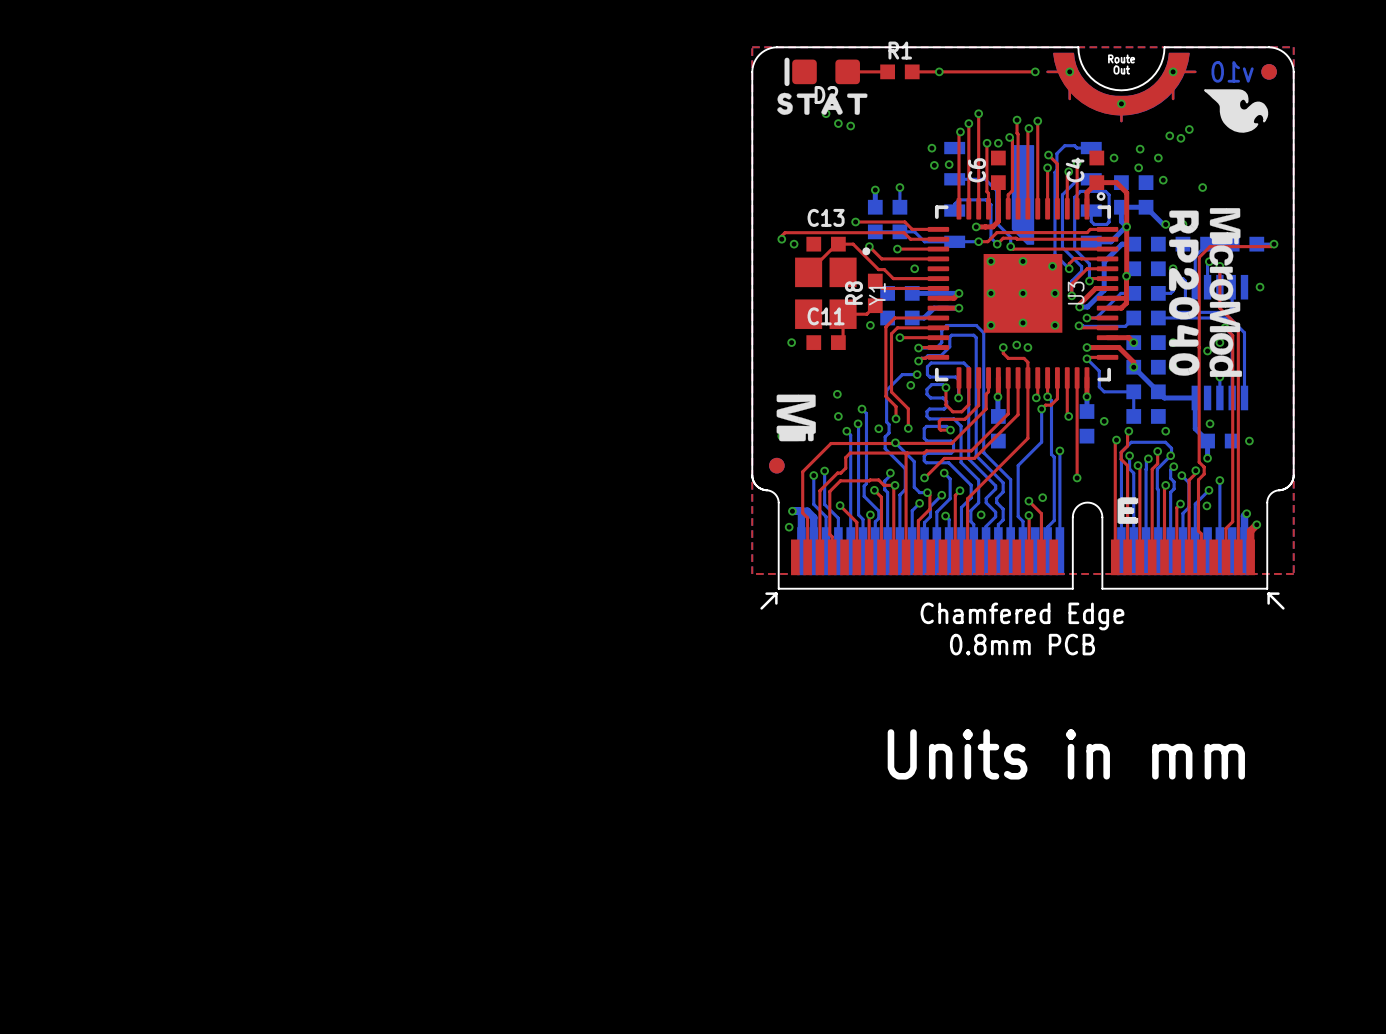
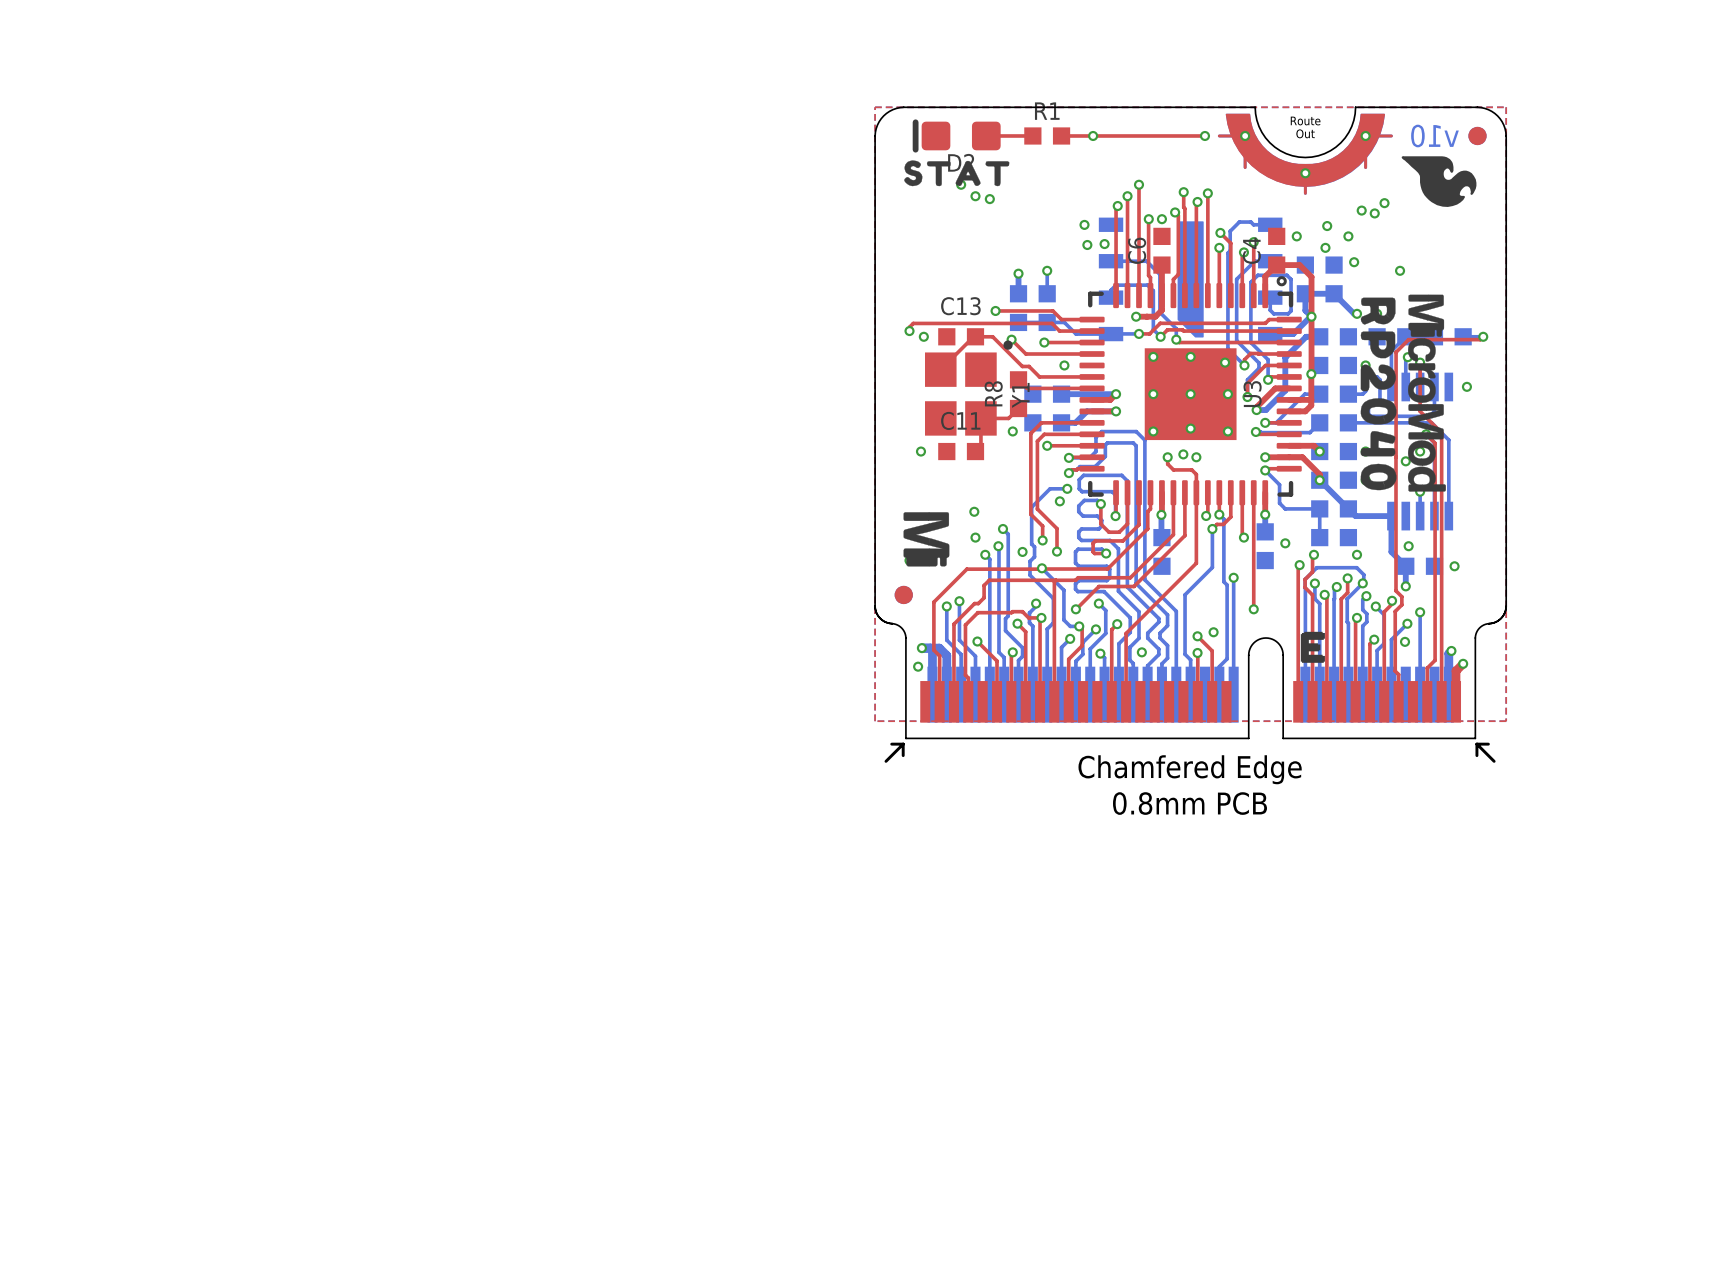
text: Units in mm (1066, 754) -> none

